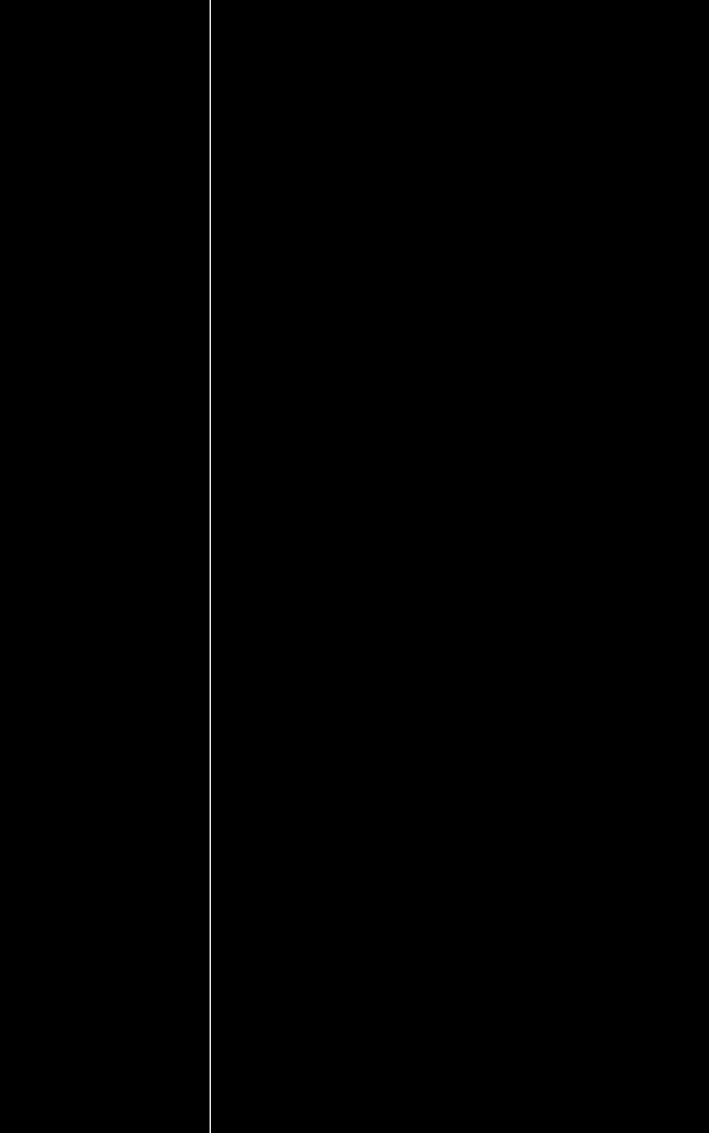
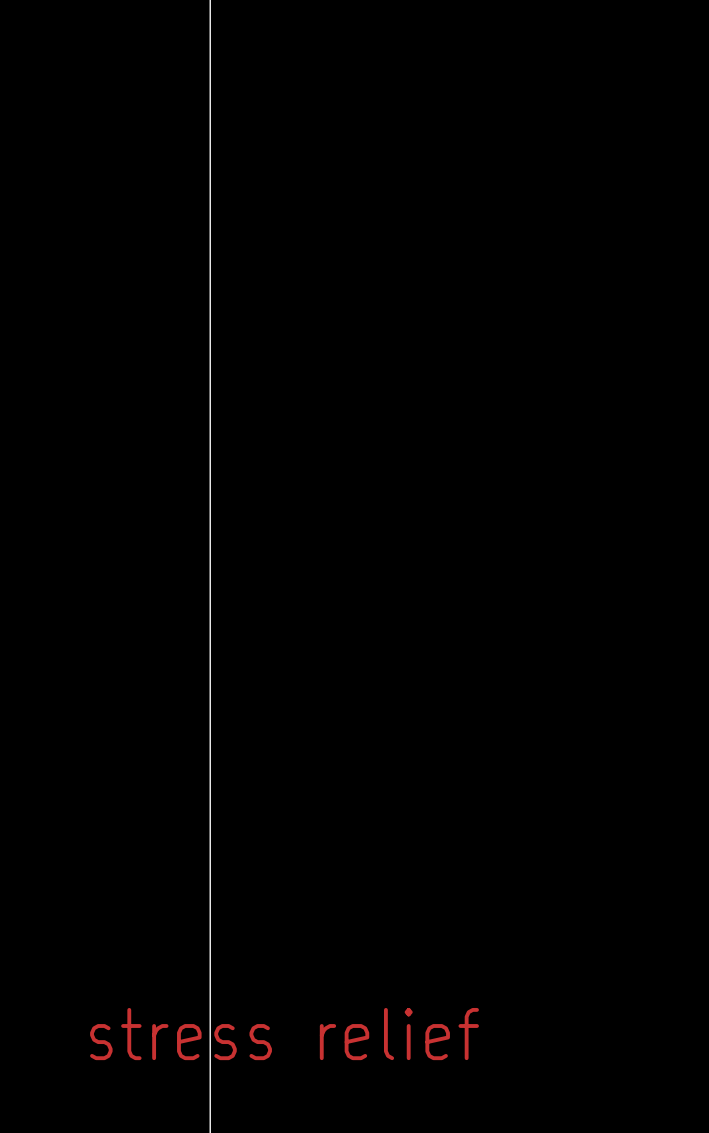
text: none -> stress relief (284, 1034)

